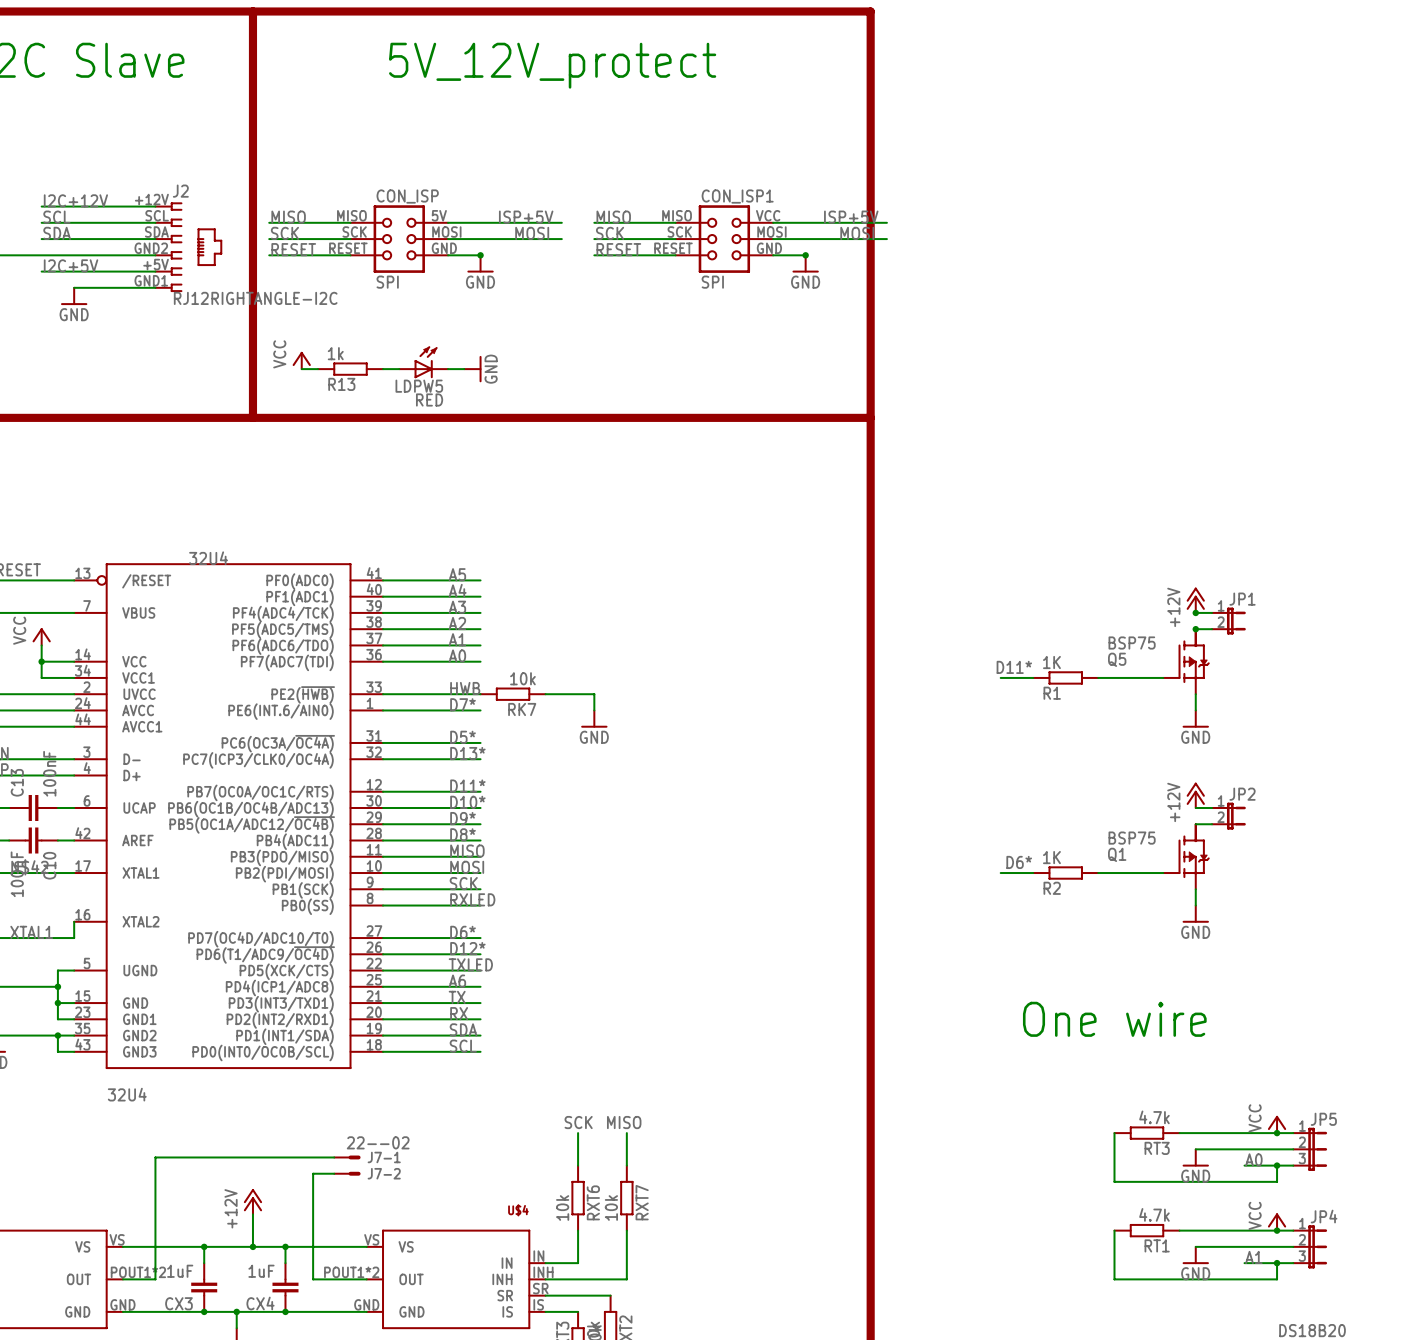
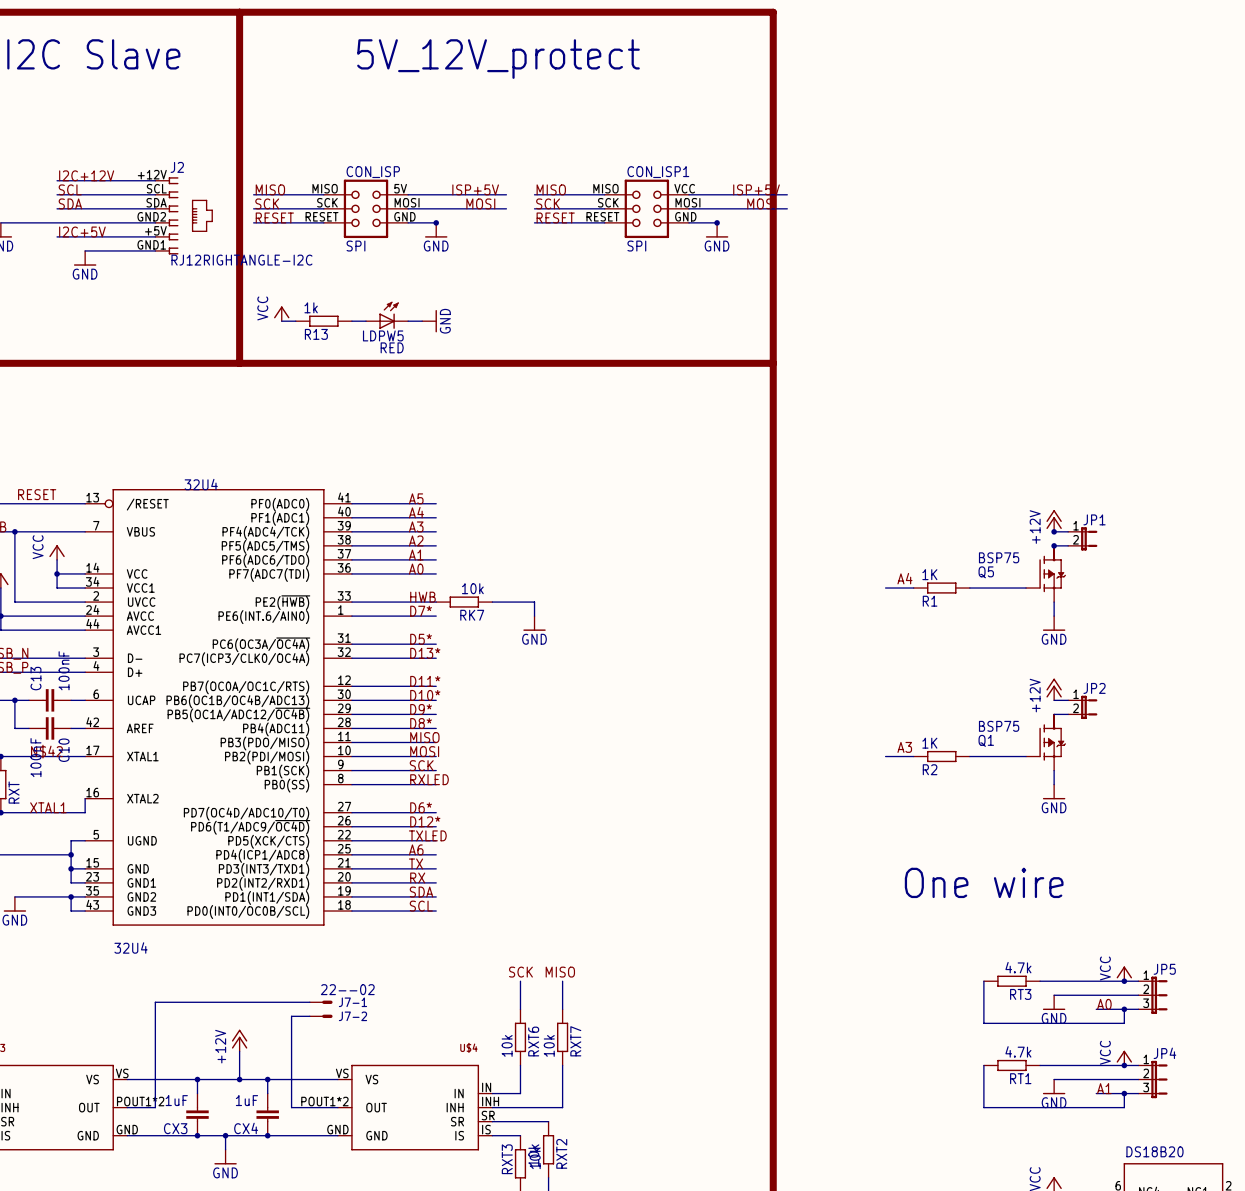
label: D11* (1014, 667) -> A4 (904, 578)
label: D6* (1019, 862) -> A3 (904, 747)

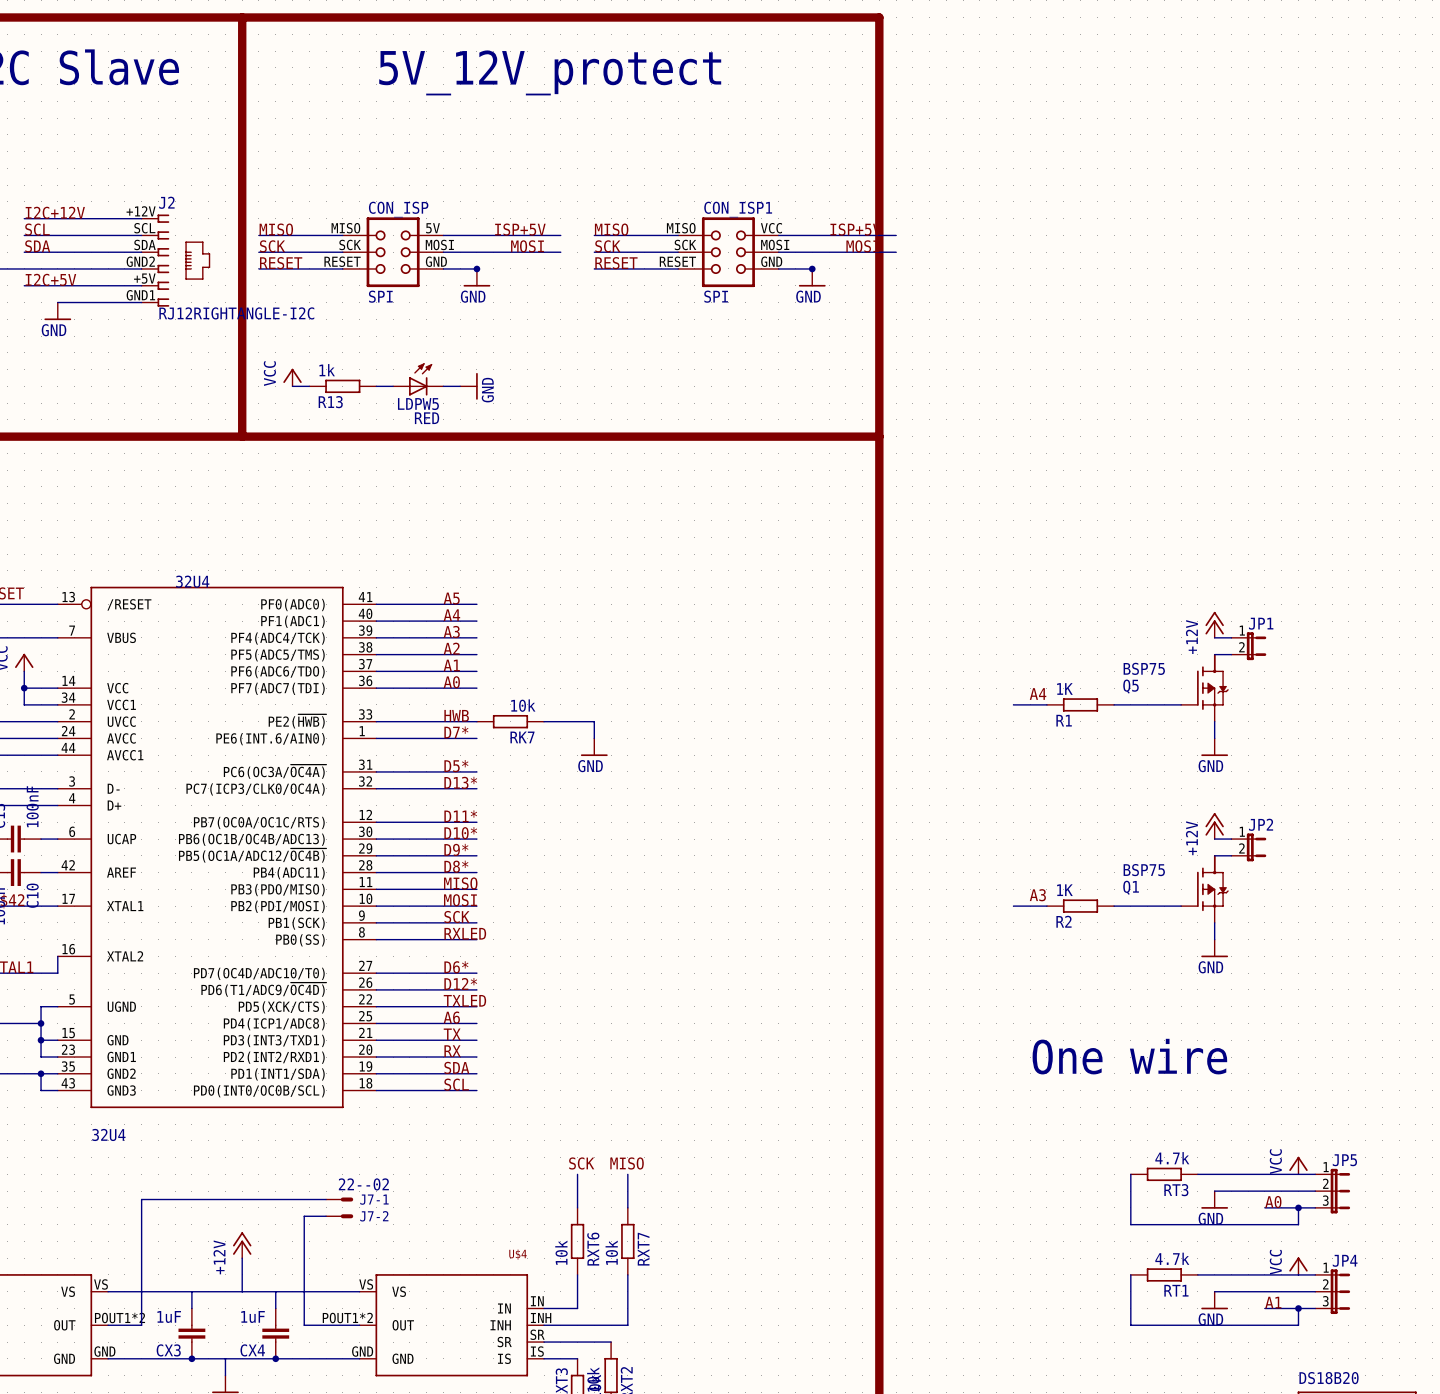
junction: (1054, 531) -> none
junction: (1054, 545) -> none
junction: (1124, 981) -> none
junction: (1124, 1065) -> none
junction: (197, 1079) -> none
junction: (239, 1079) -> none
junction: (267, 1079) -> none
junction: (225, 1135) -> none

